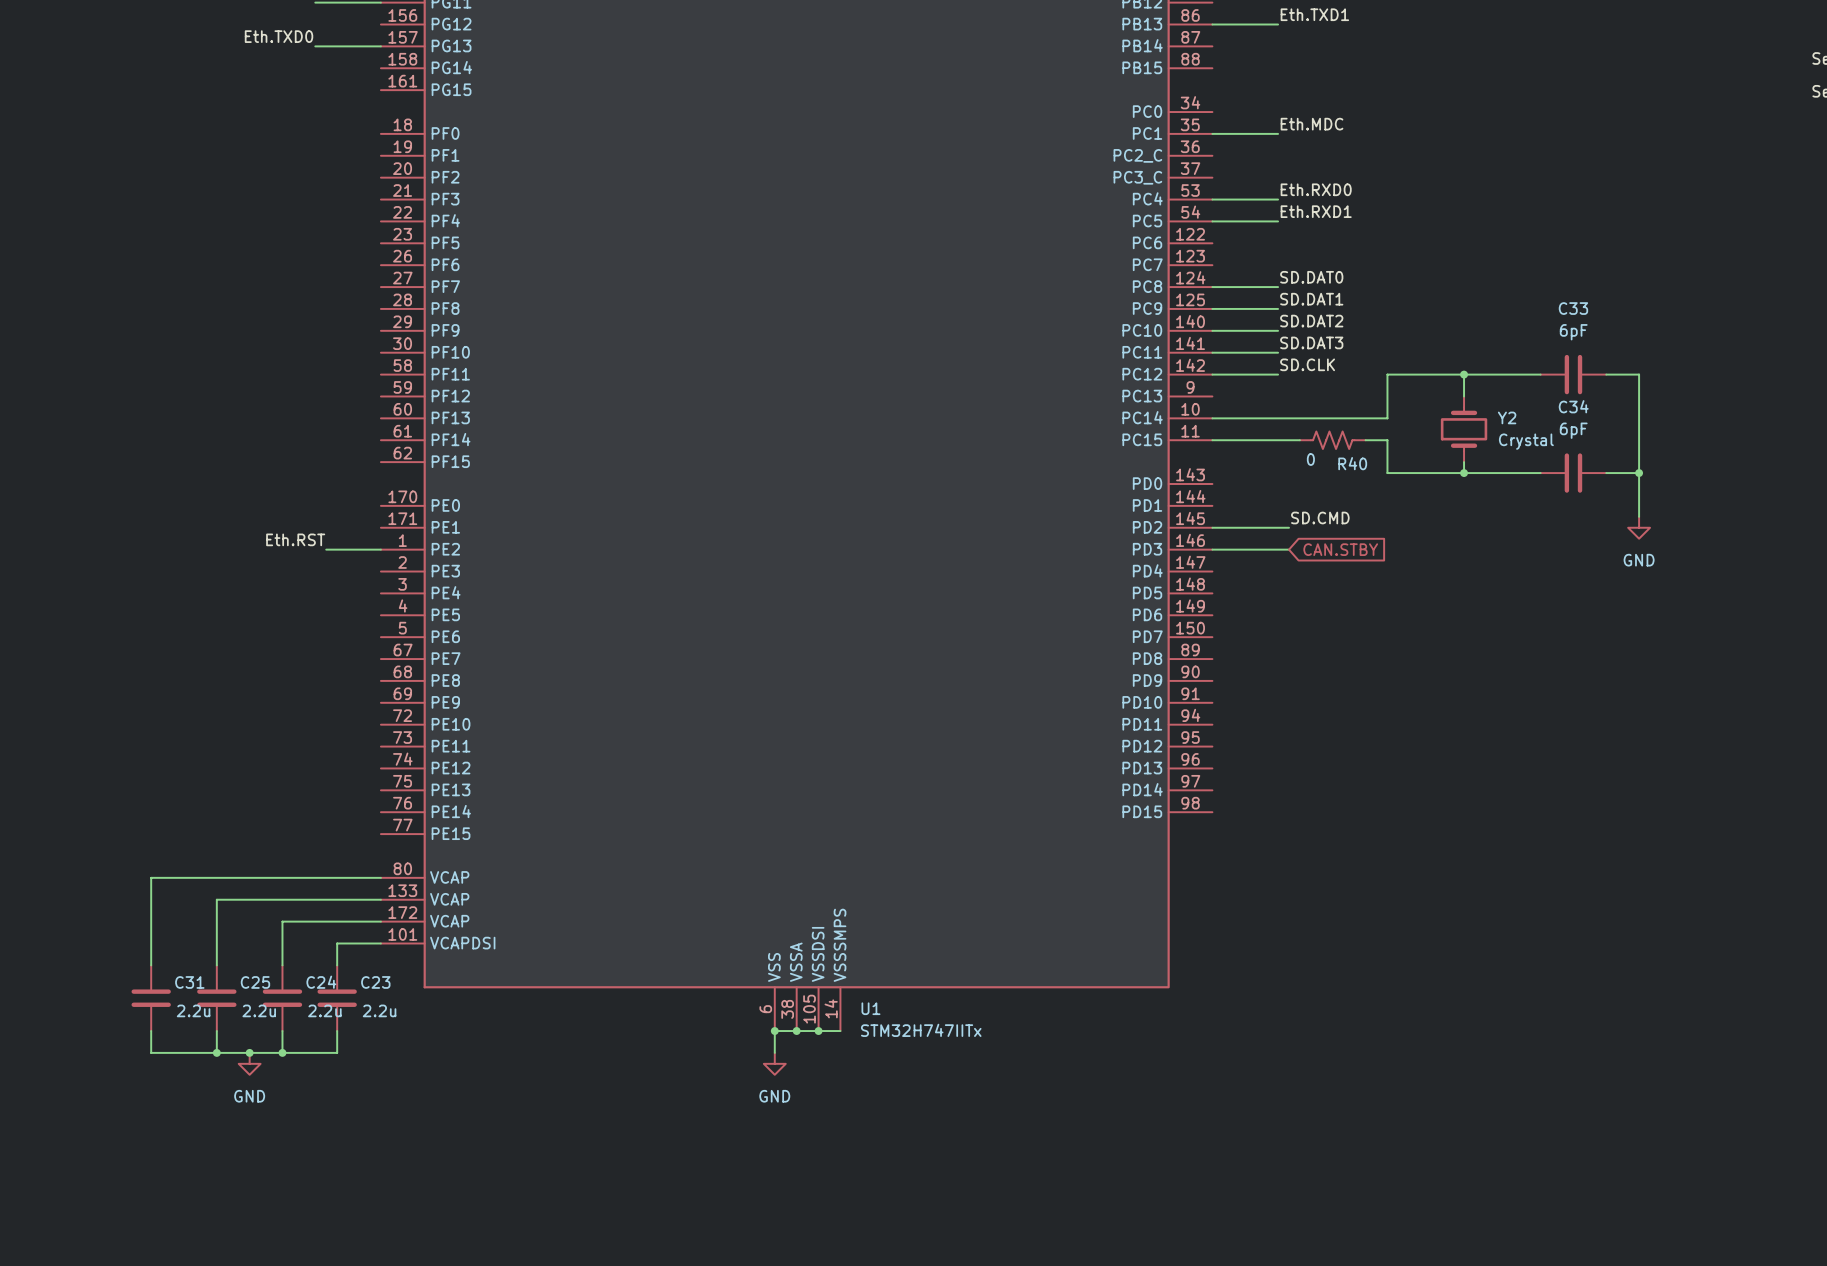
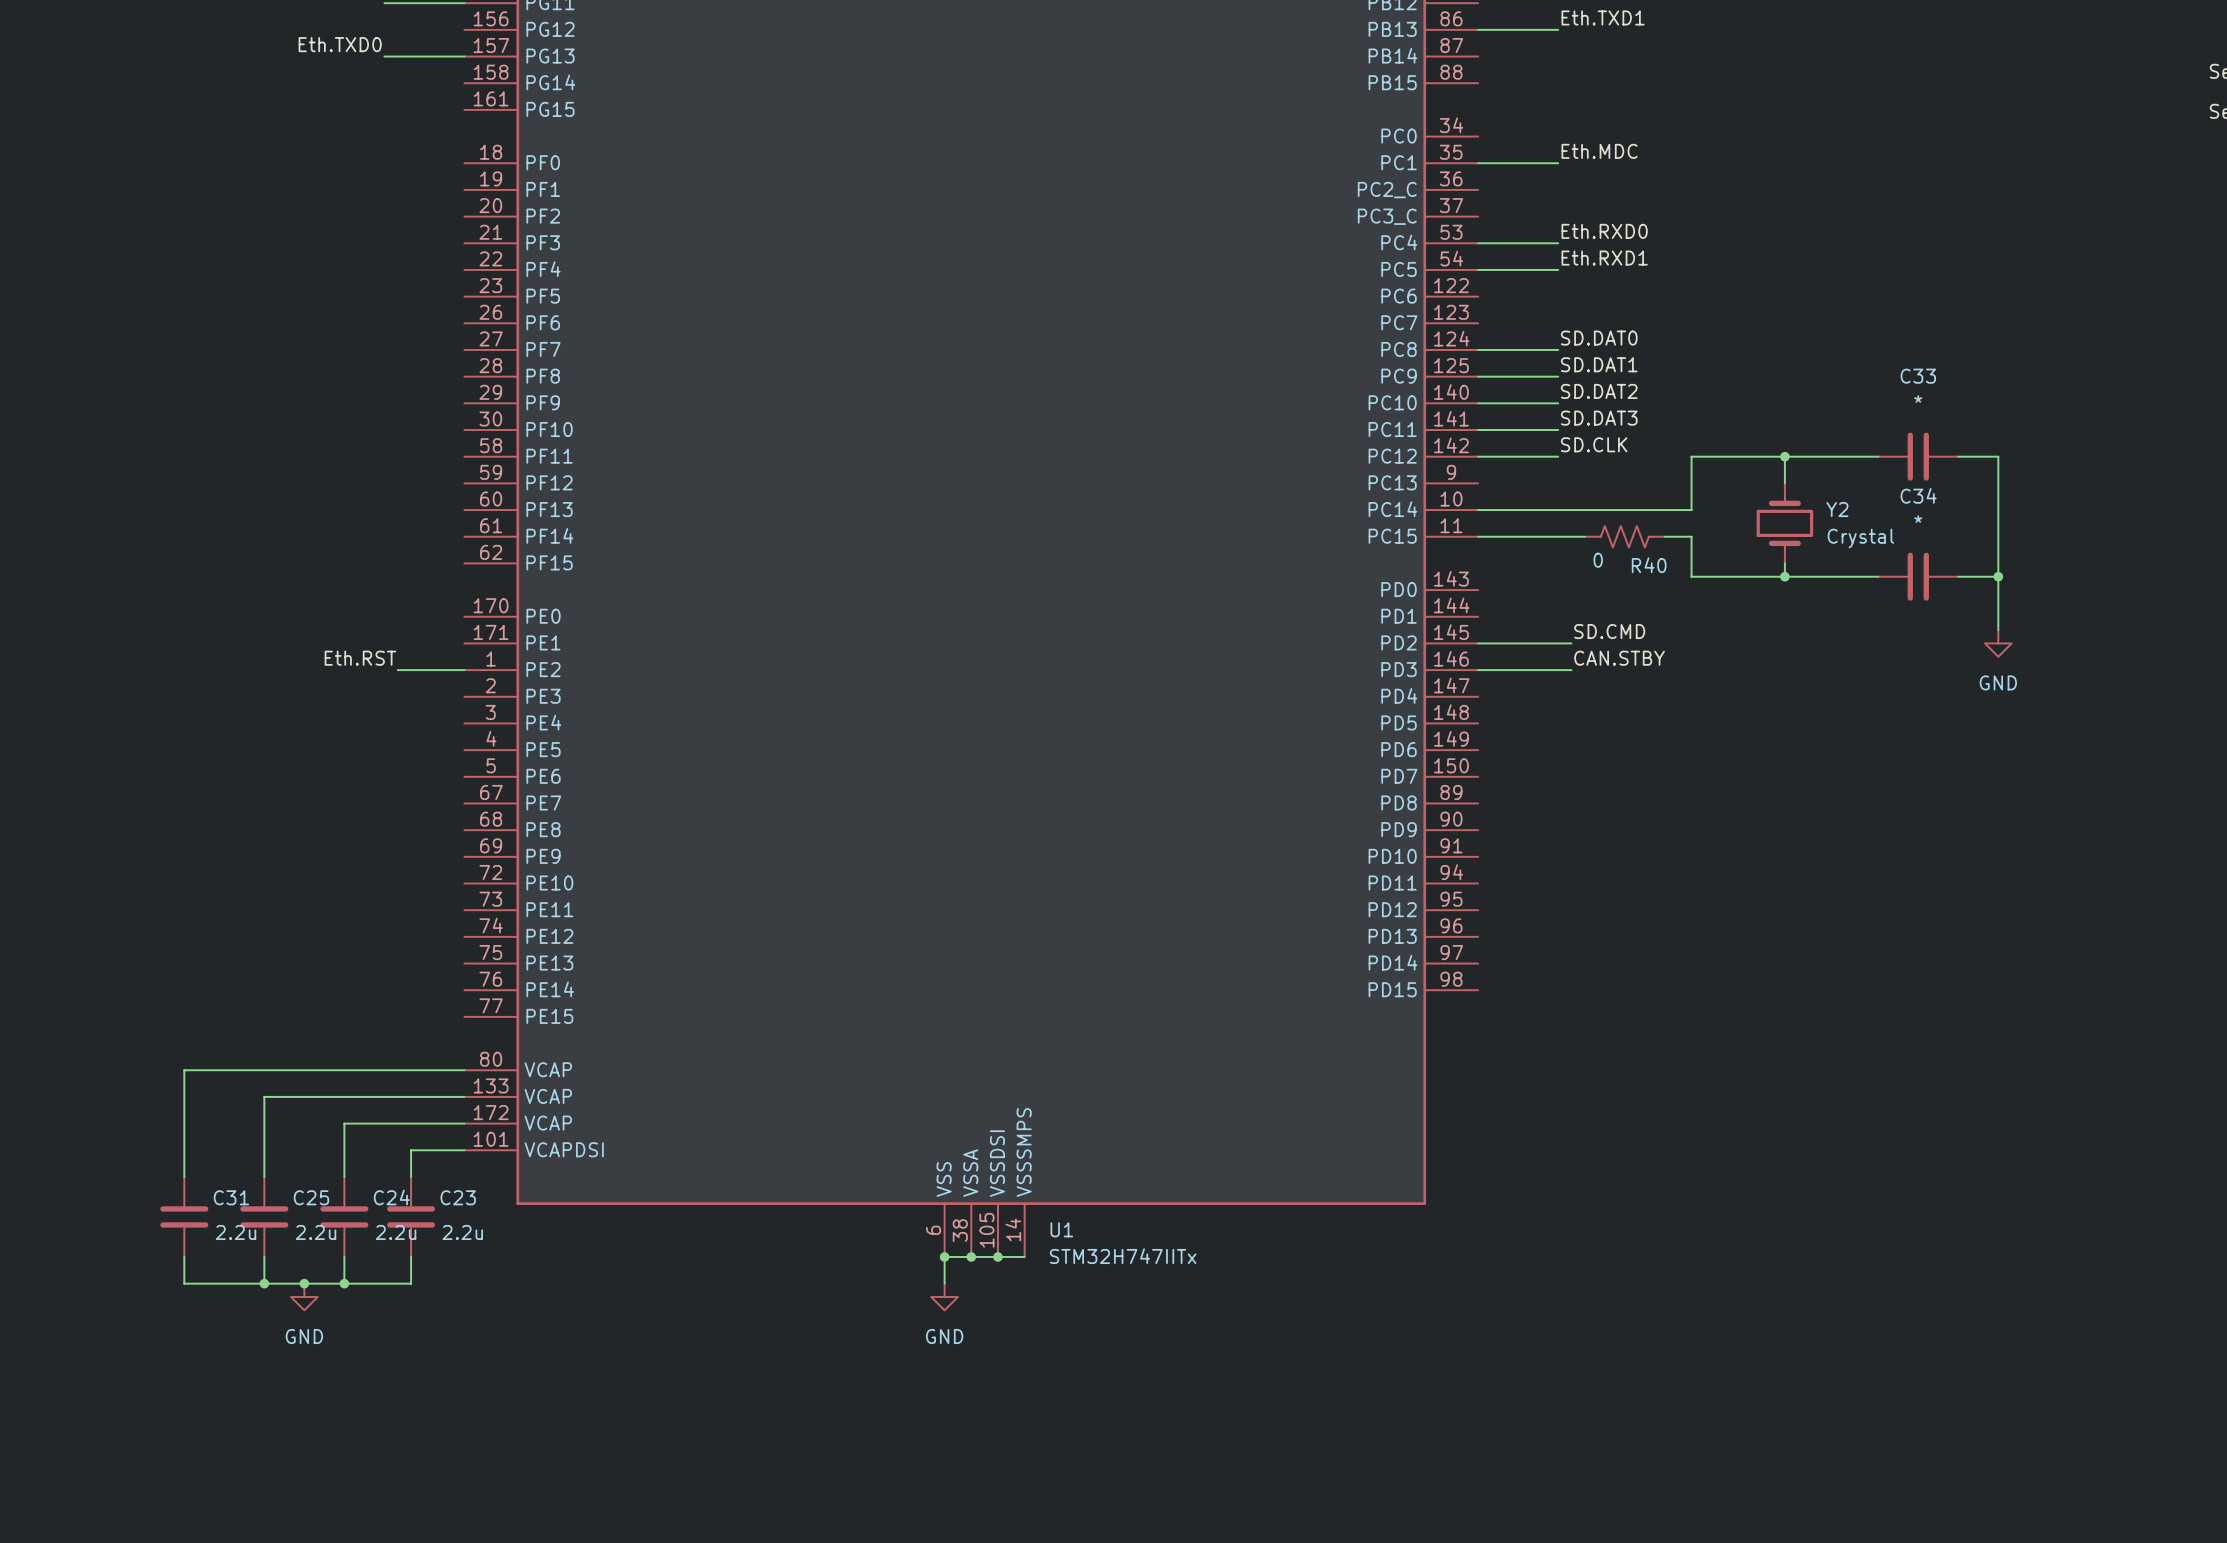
C33 value: 6pF (1573, 332) -> * (1918, 399)
C34 value: 6pF (1573, 430) -> * (1918, 519)
label: none -> CAN.STBY (1619, 658)
global label: CAN.STBY (1340, 549) -> none

